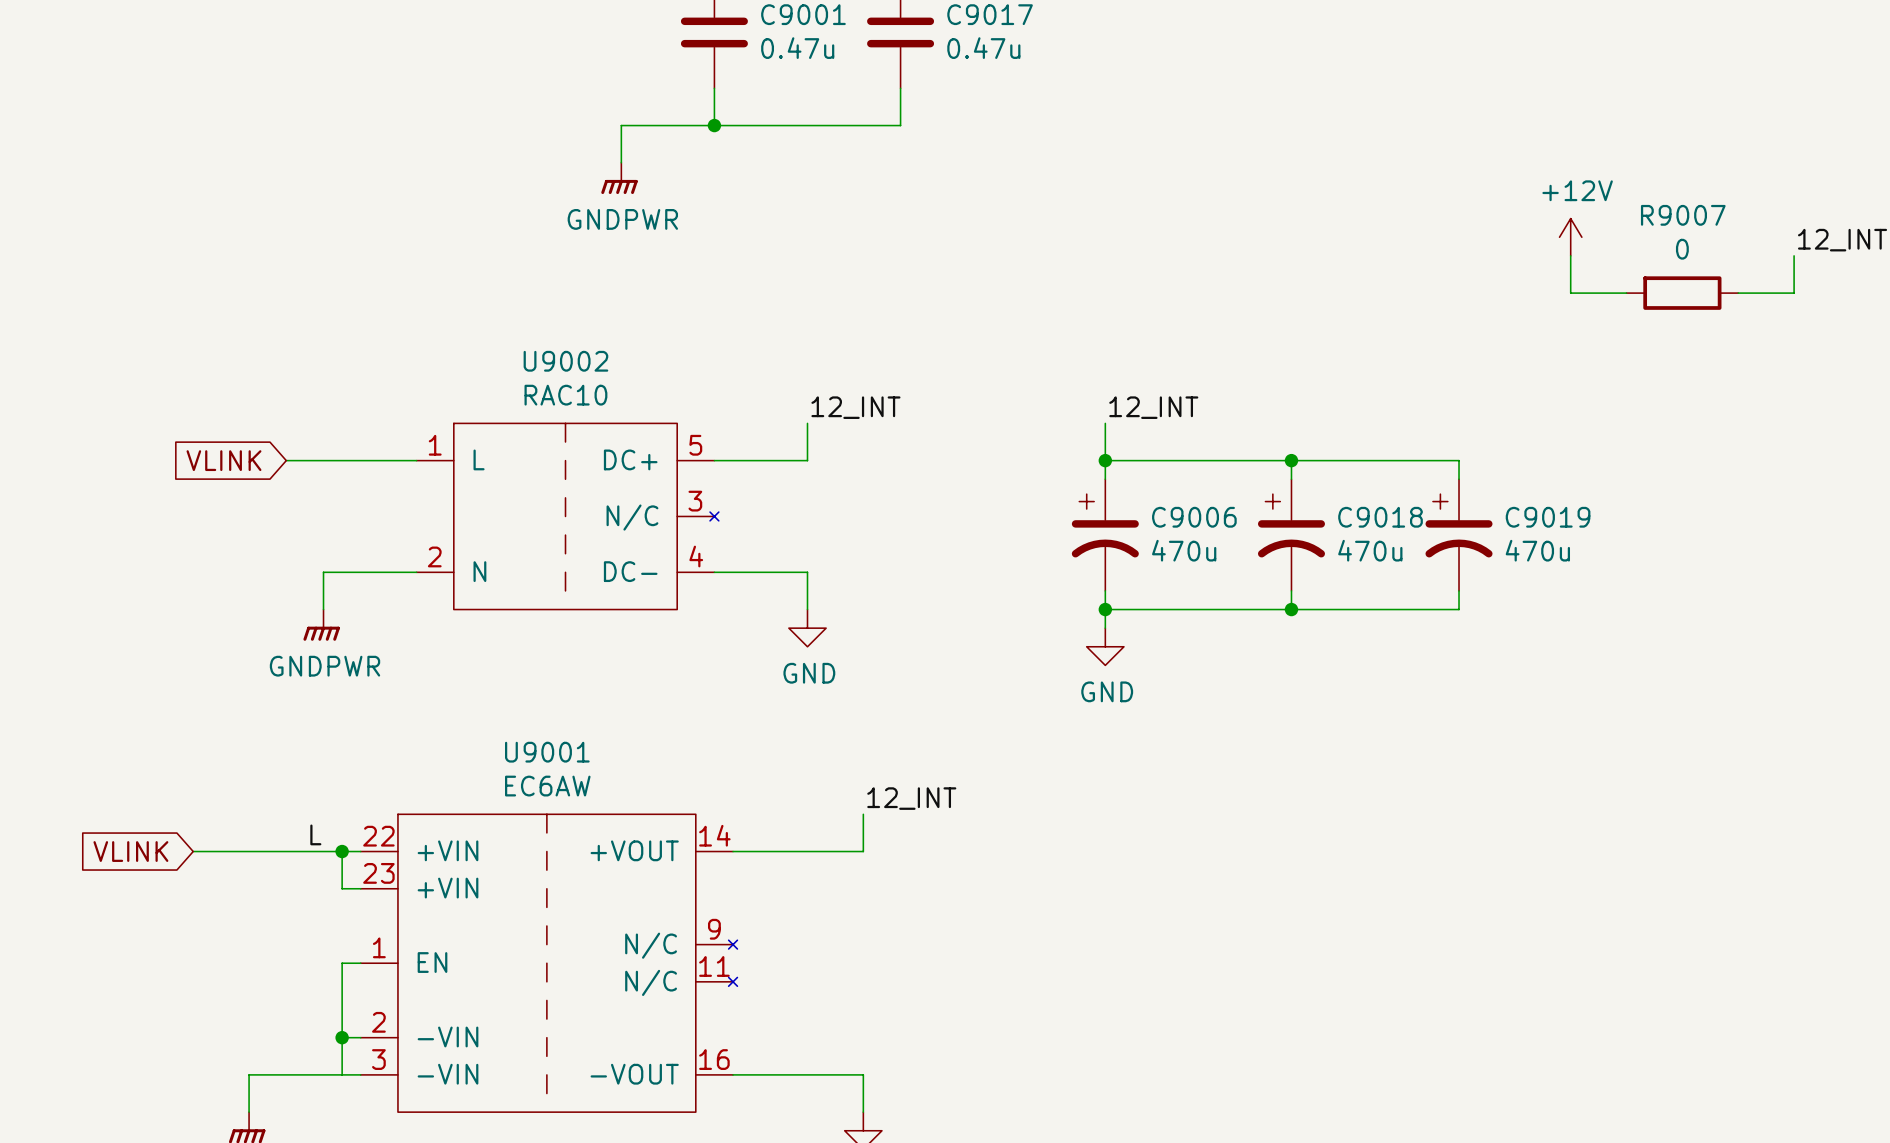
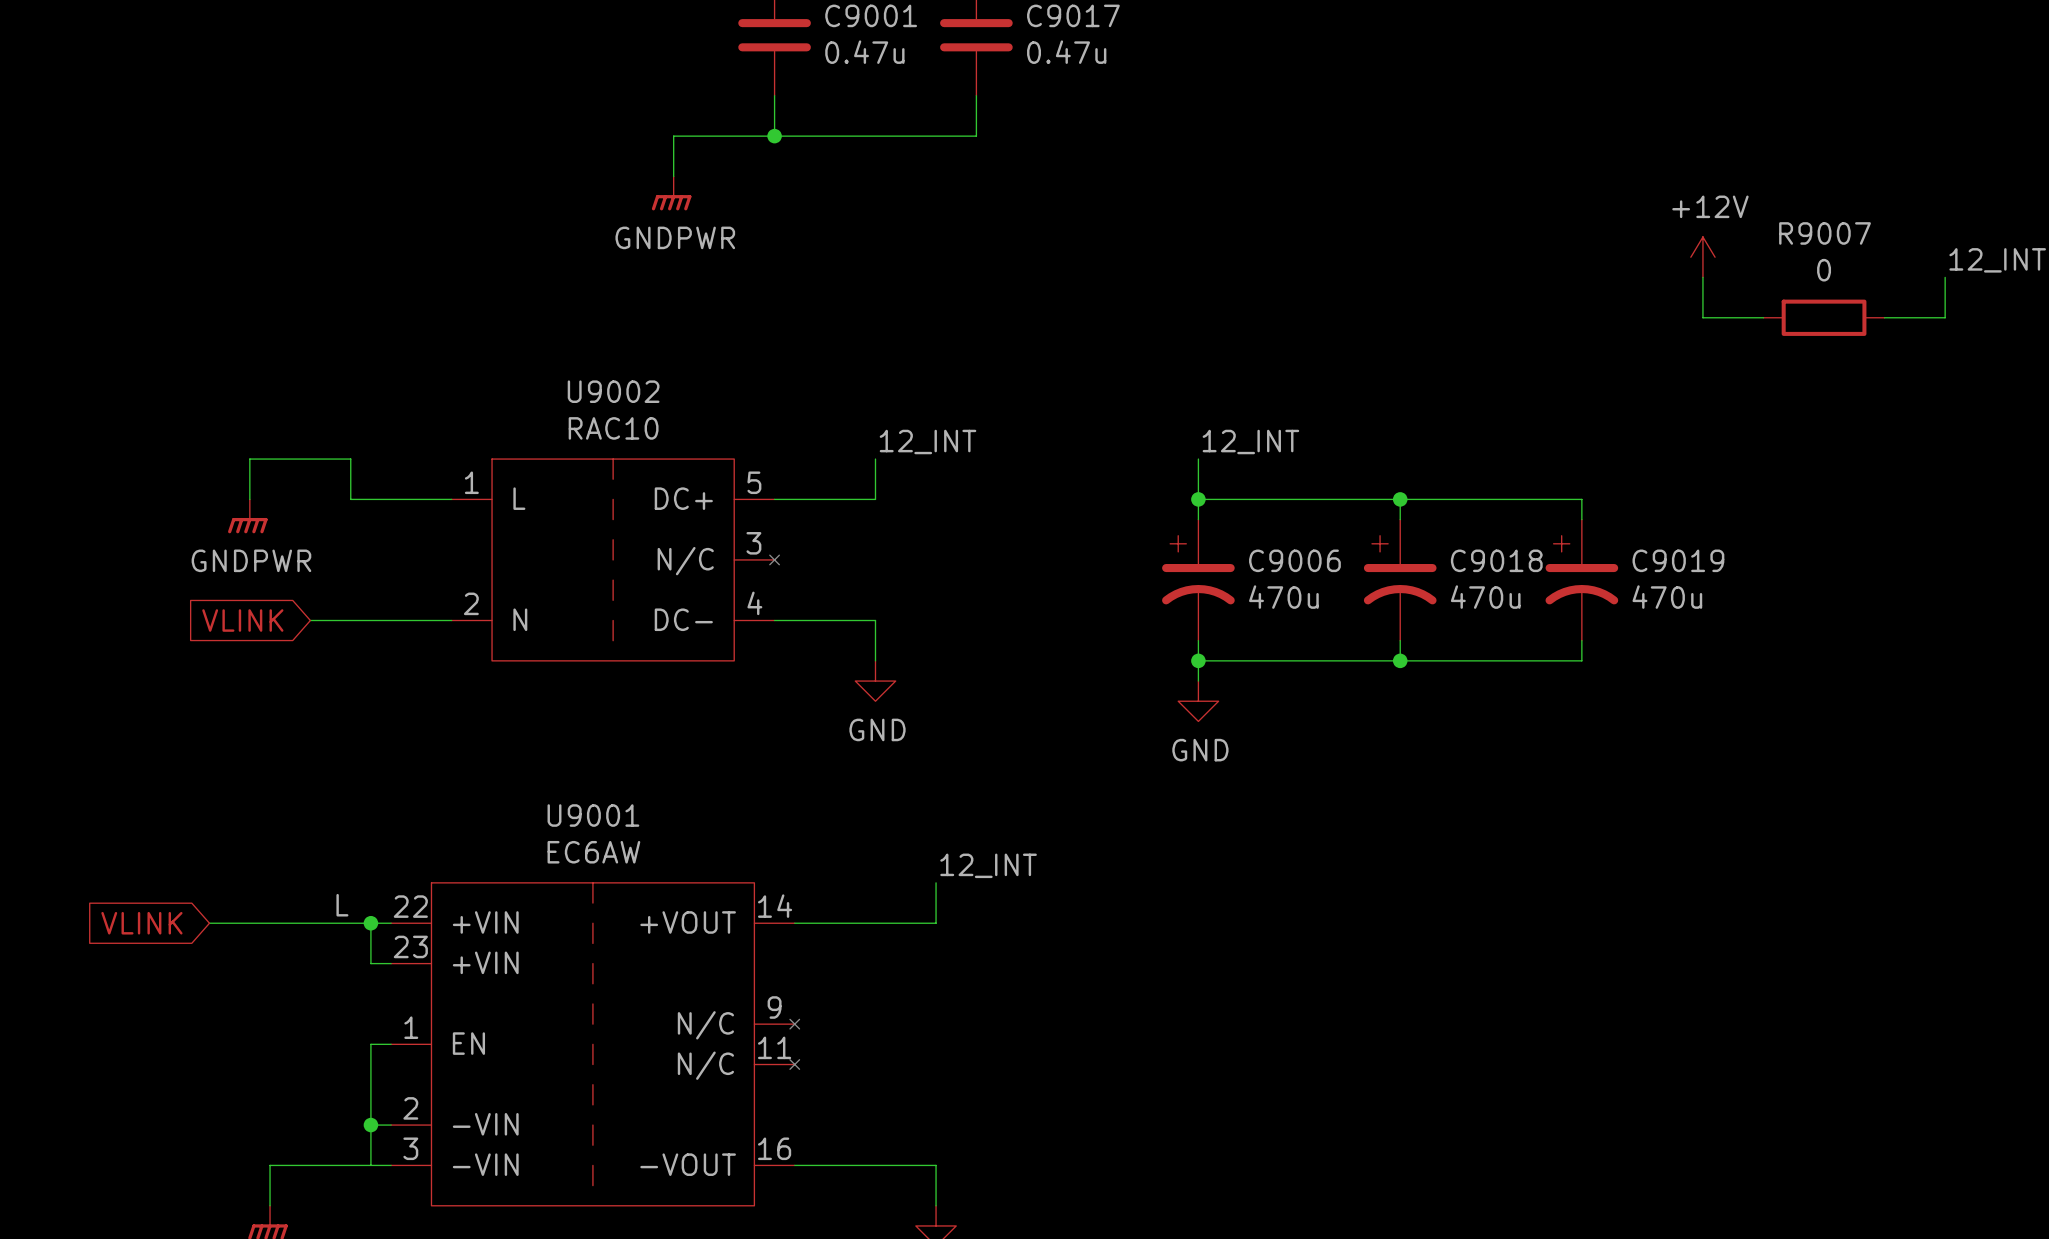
global label position: VLINK (223, 460) -> VLINK (242, 620)
wire: (286, 460) (323, 460) -> (249, 499) (249, 459) (350, 459) (350, 499)
wire: (323, 572) (323, 609) -> (350, 620) (310, 620)
power symbol position: GNDPWR (321, 625) -> GNDPWR (247, 516)

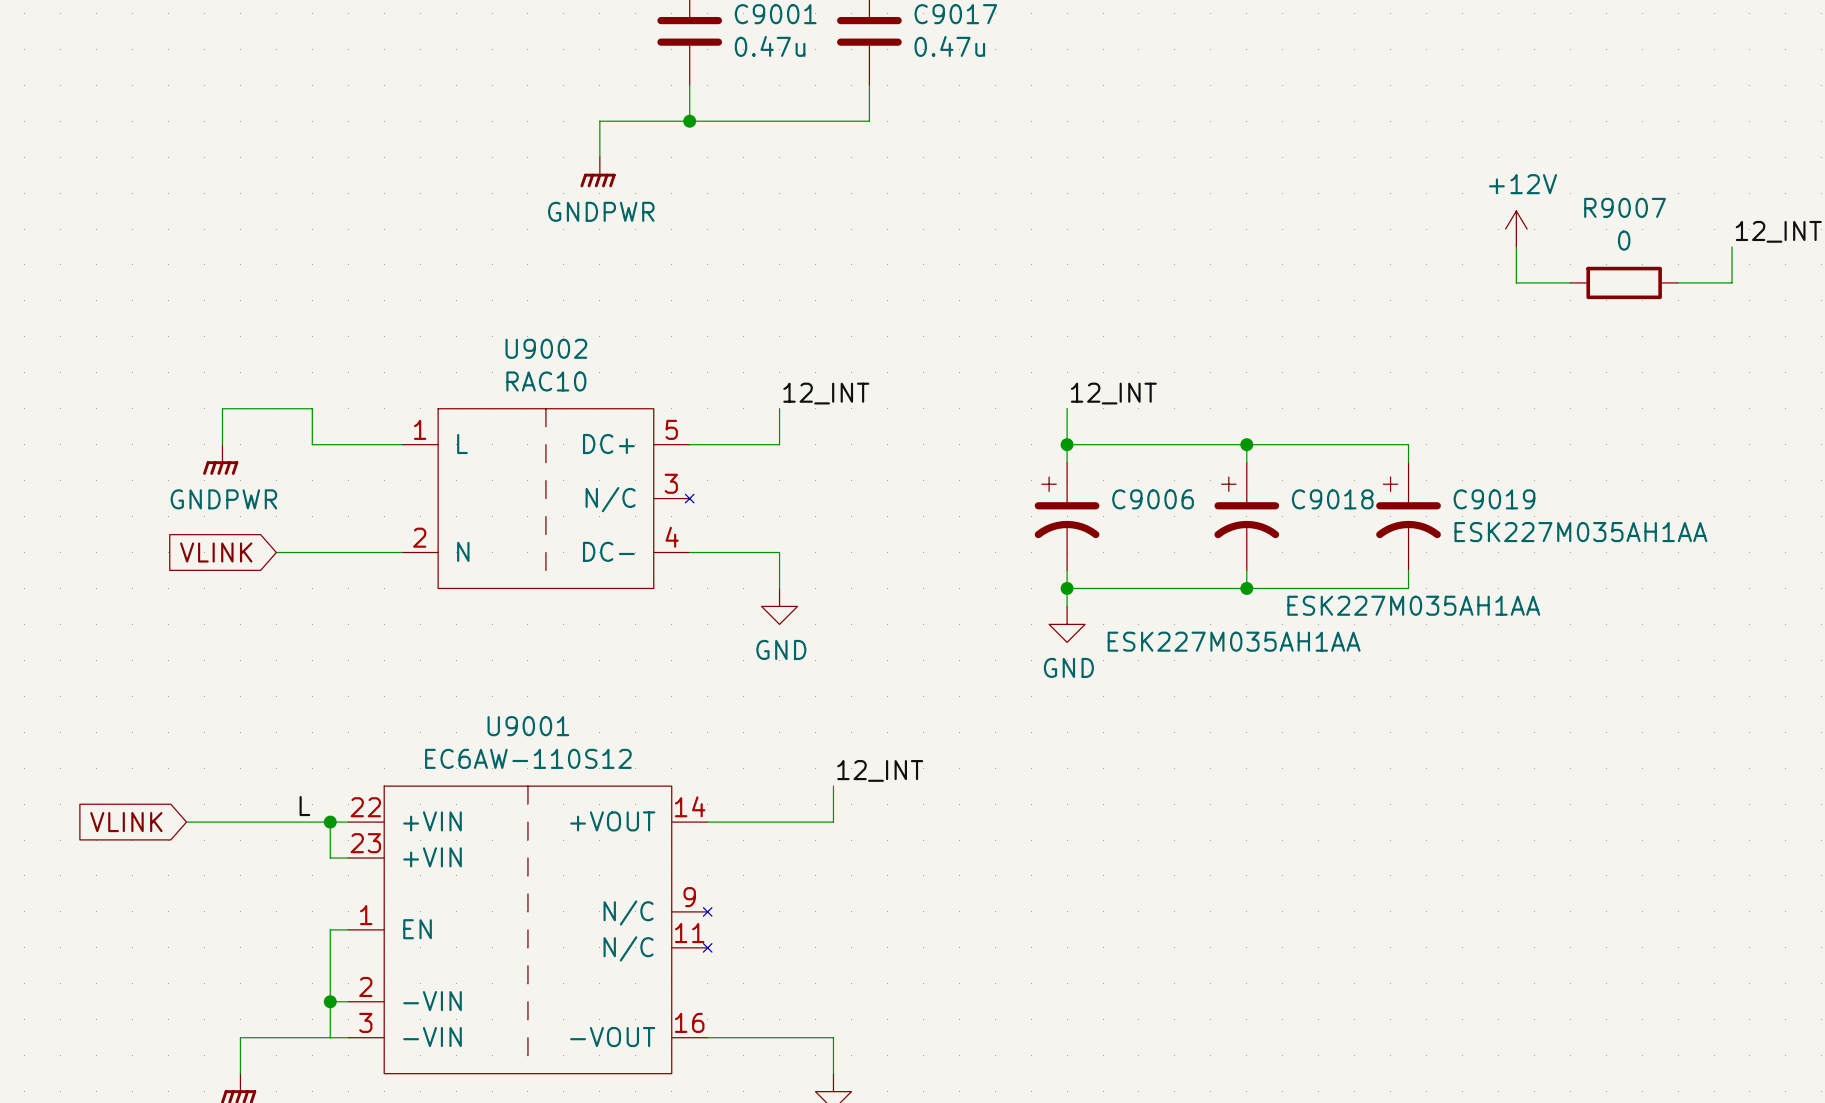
C9006 value: 470u (1283, 597) -> ESK227M035AH1AA (1234, 641)
C9018 value: 470u (1485, 597) -> ESK227M035AH1AA (1413, 605)
C9019 value: 470u (1667, 597) -> ESK227M035AH1AA (1580, 532)
U9001 value: EC6AW (593, 852) -> EC6AW-110S12 (528, 758)

